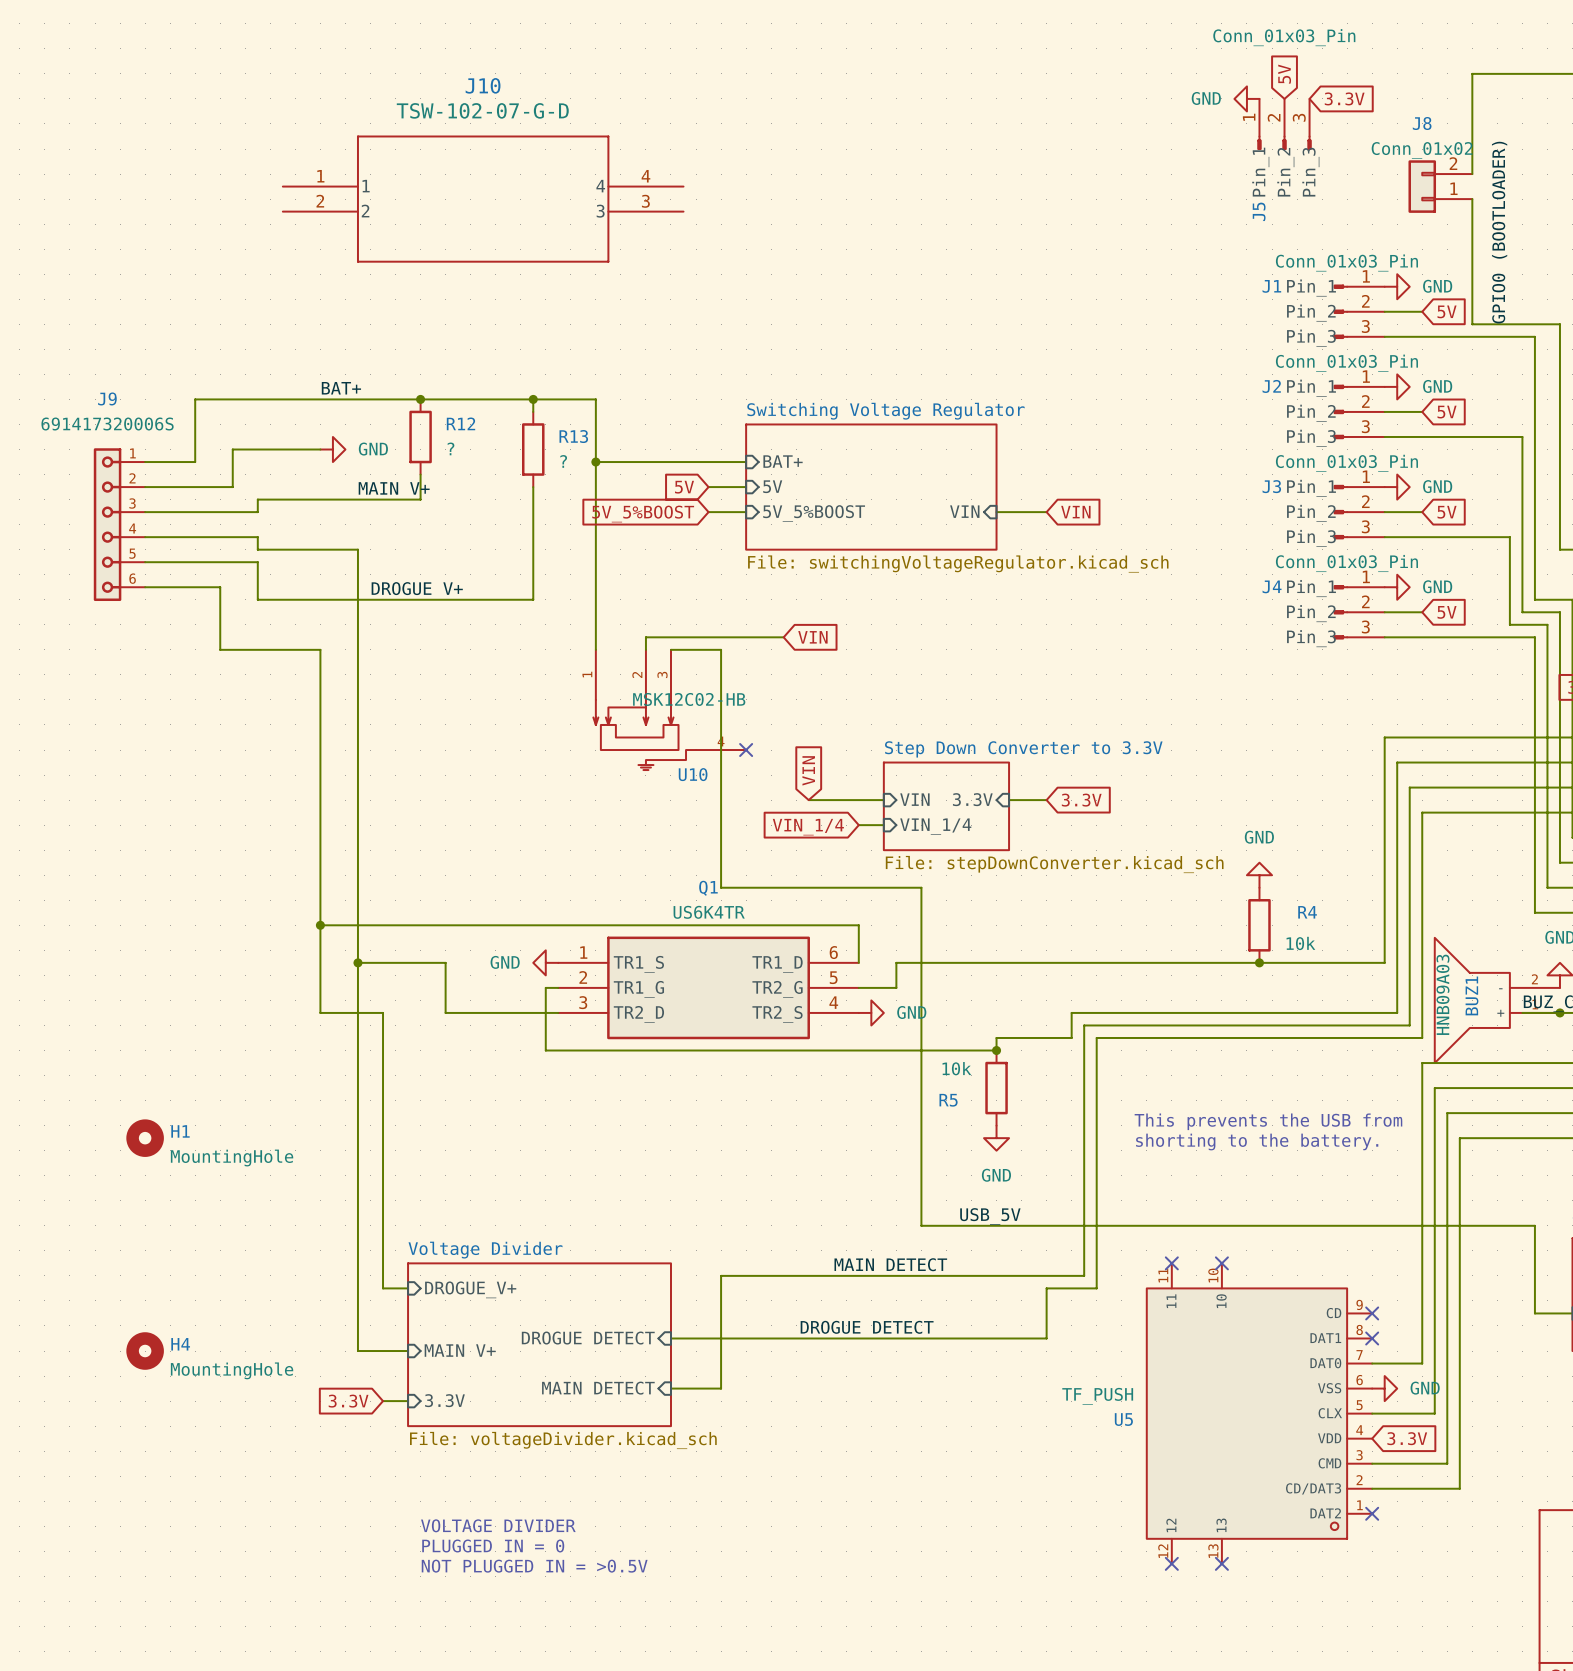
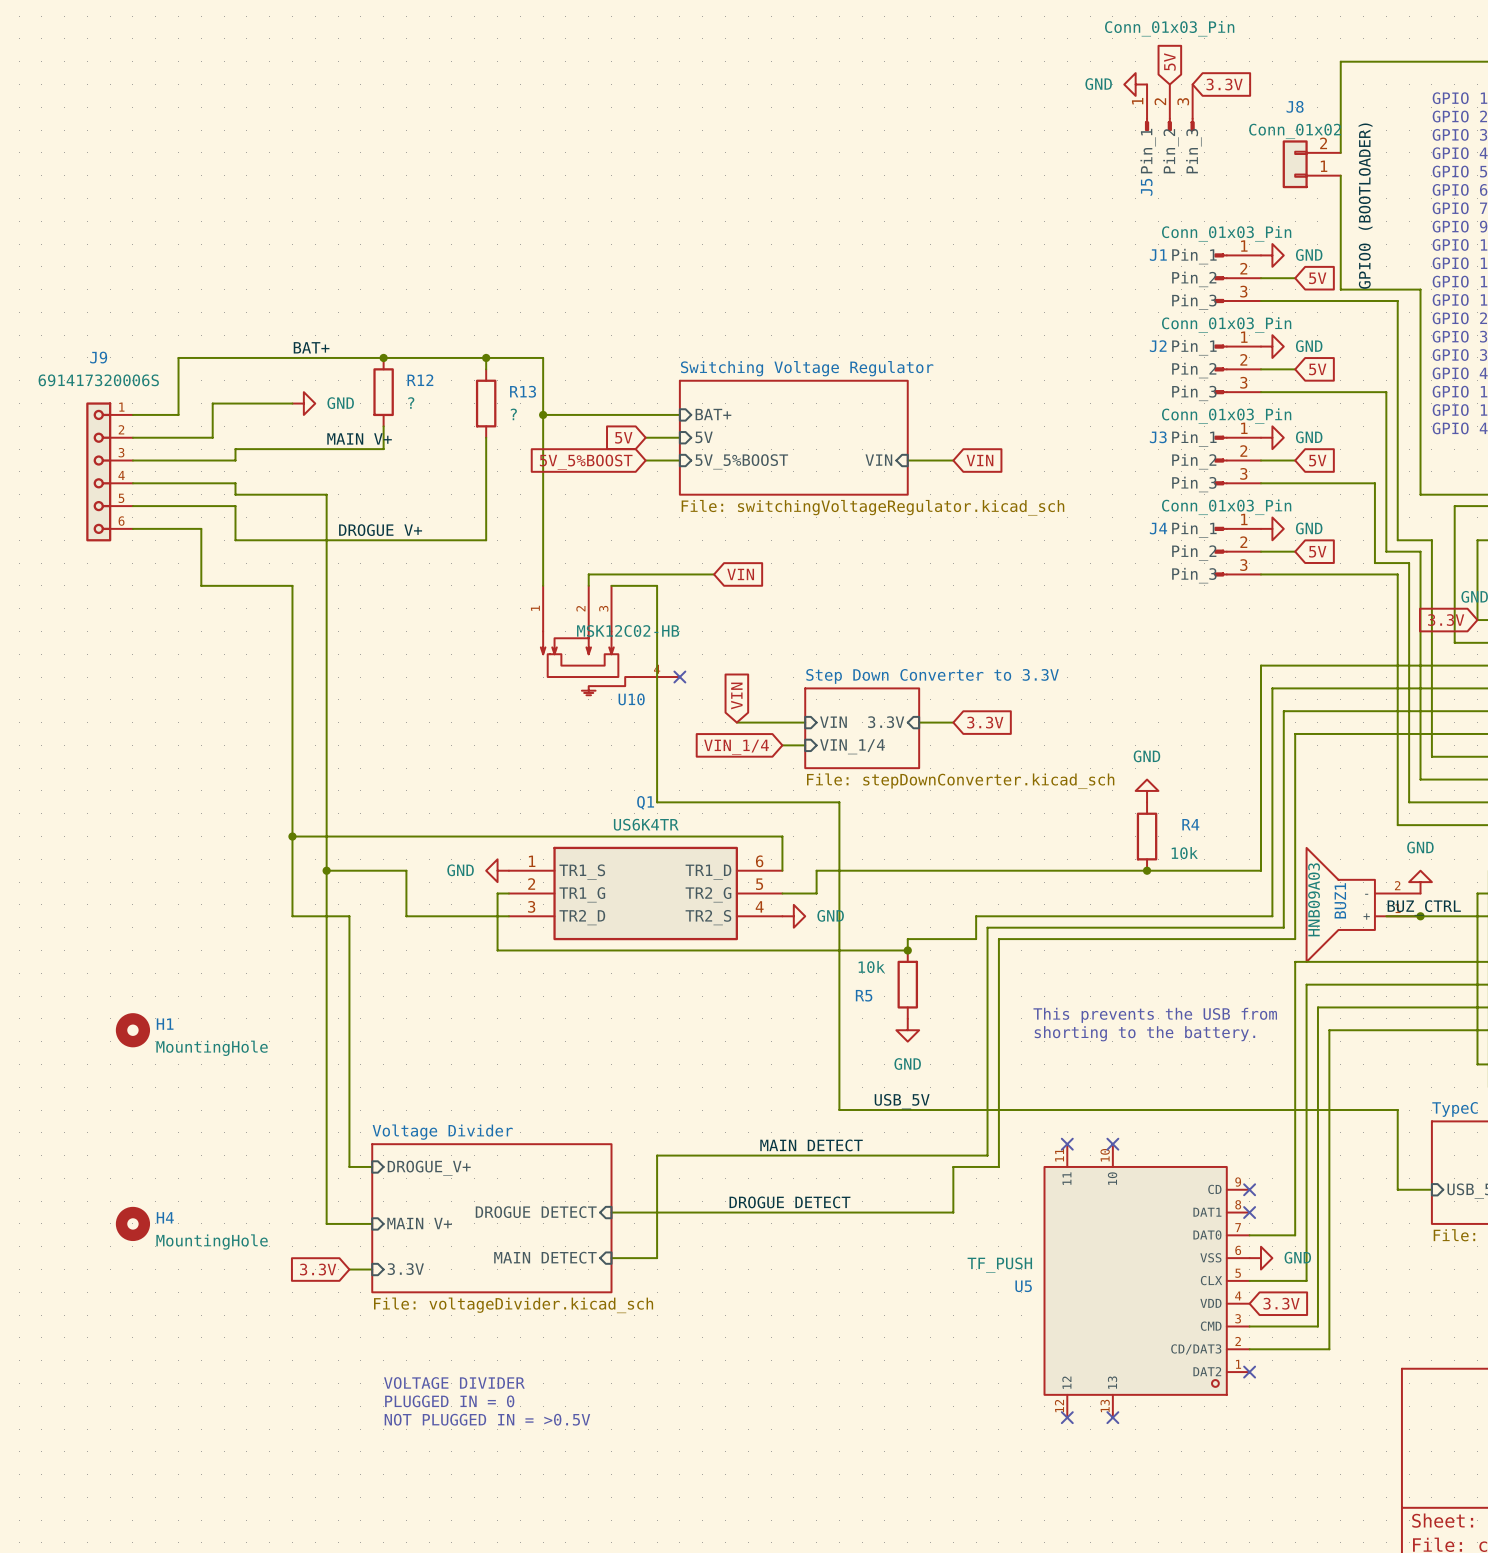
J10: TSW-102-07-G-D (483, 199) -> none

